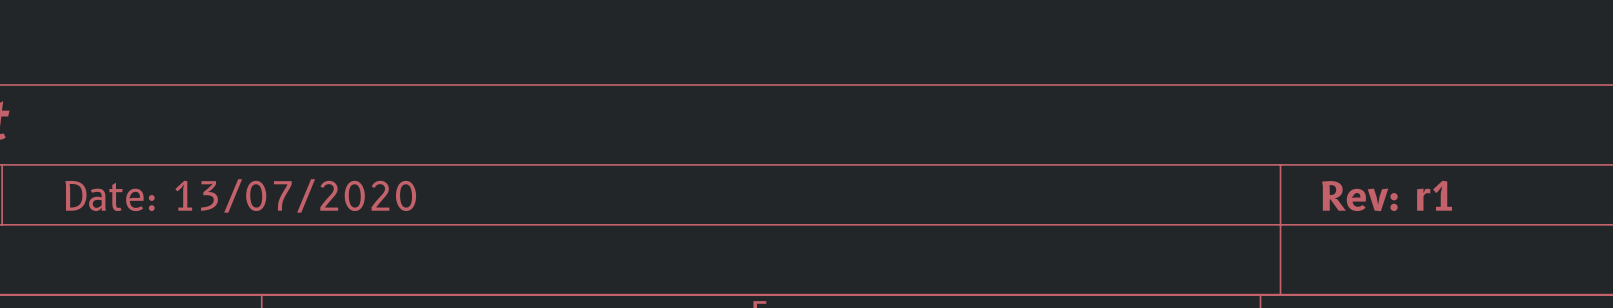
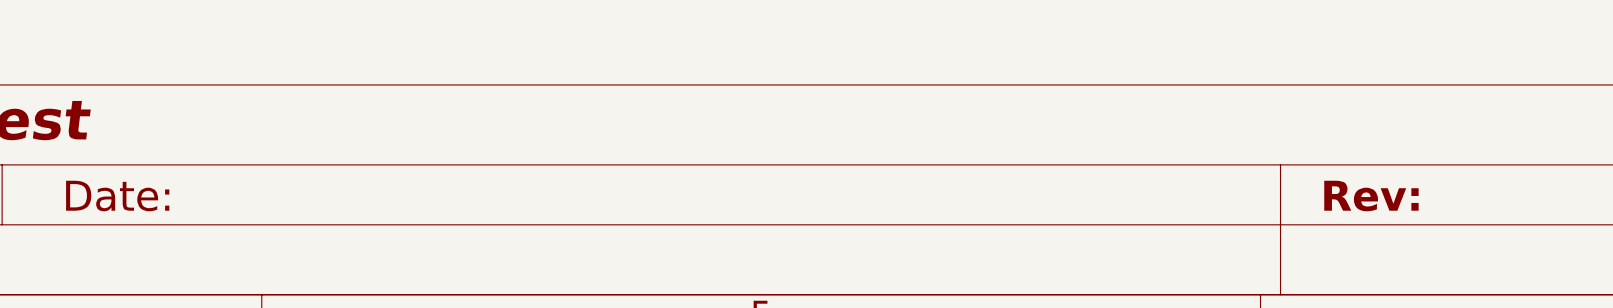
title block: Date: 13/07/2020 (240, 195) -> Date: (117, 196)
title block: Rev: r1 (1387, 195) -> Rev: (1371, 196)

